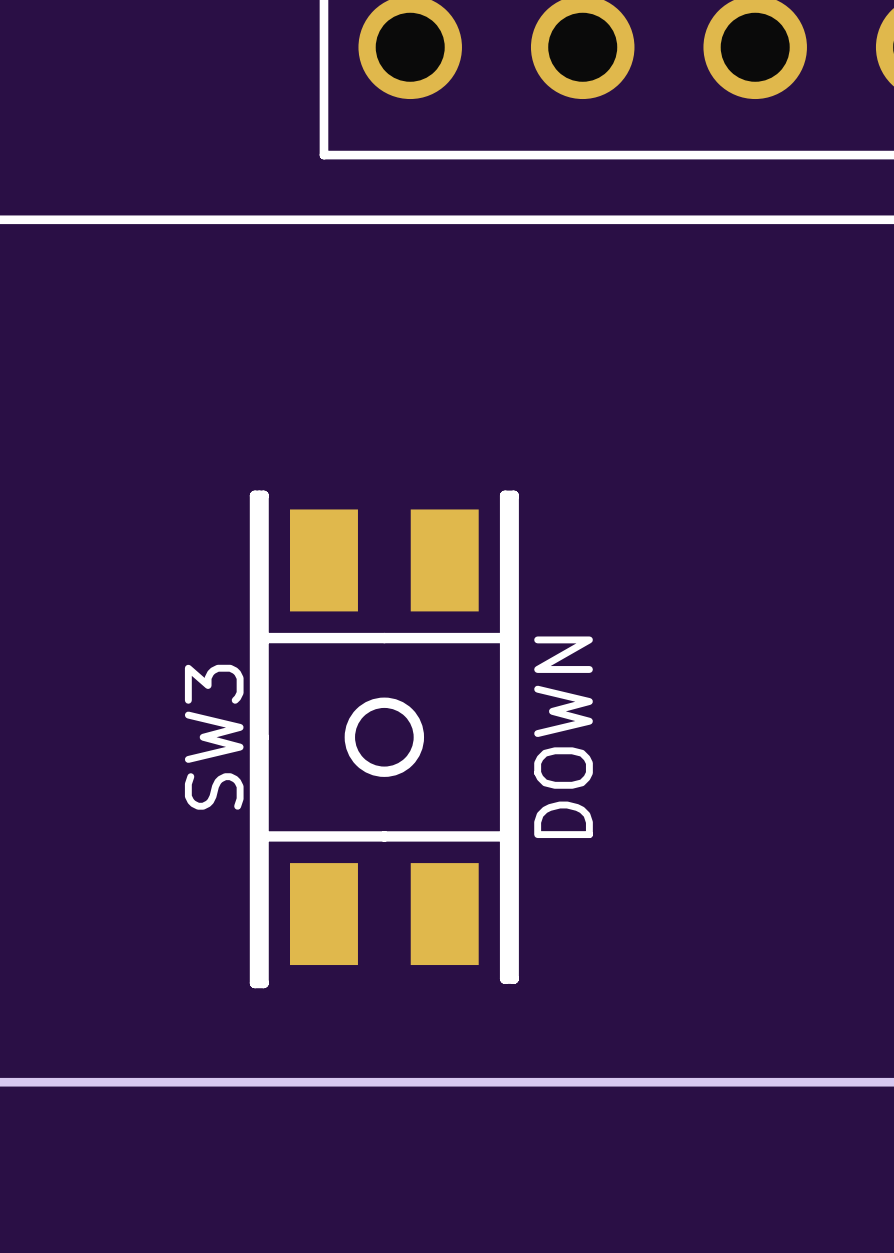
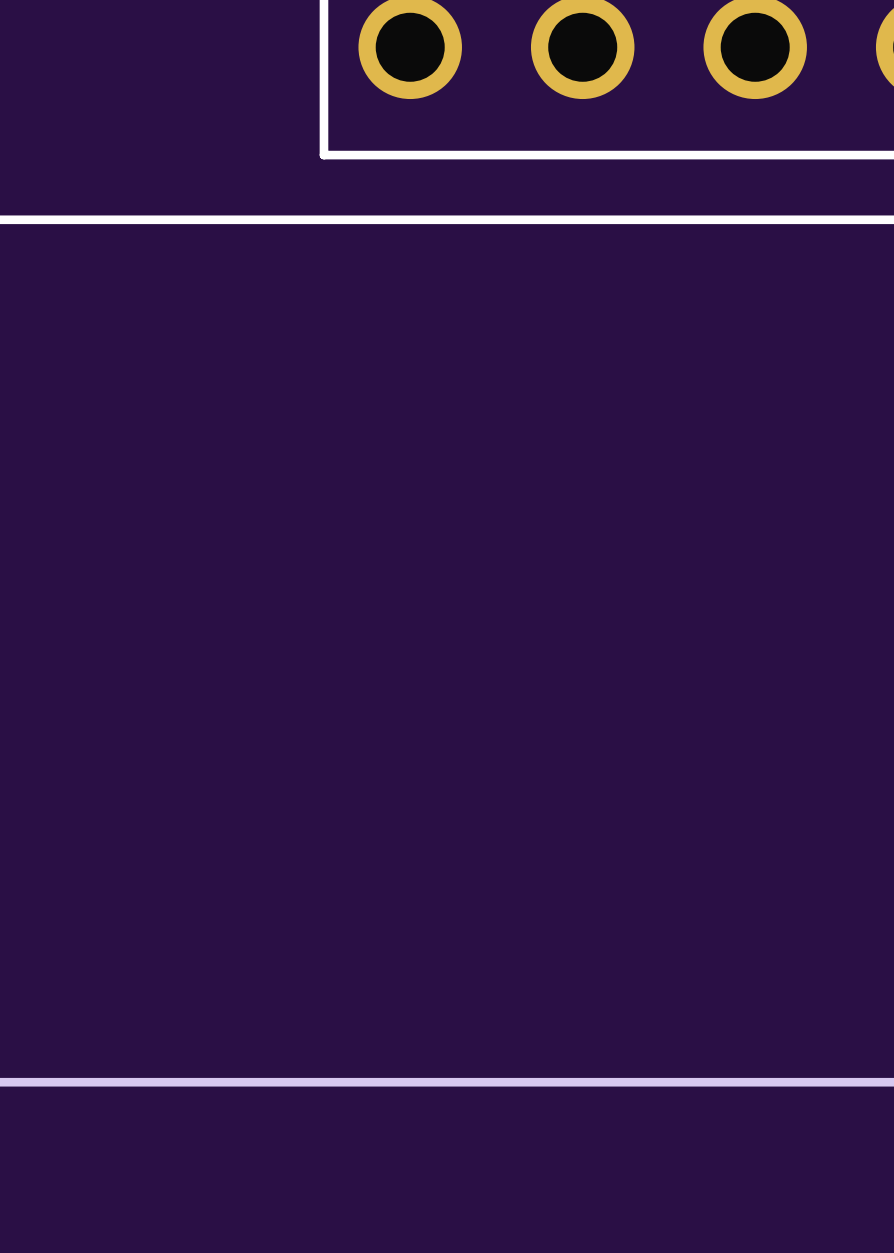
SW3: DOWN (384, 739) -> none

